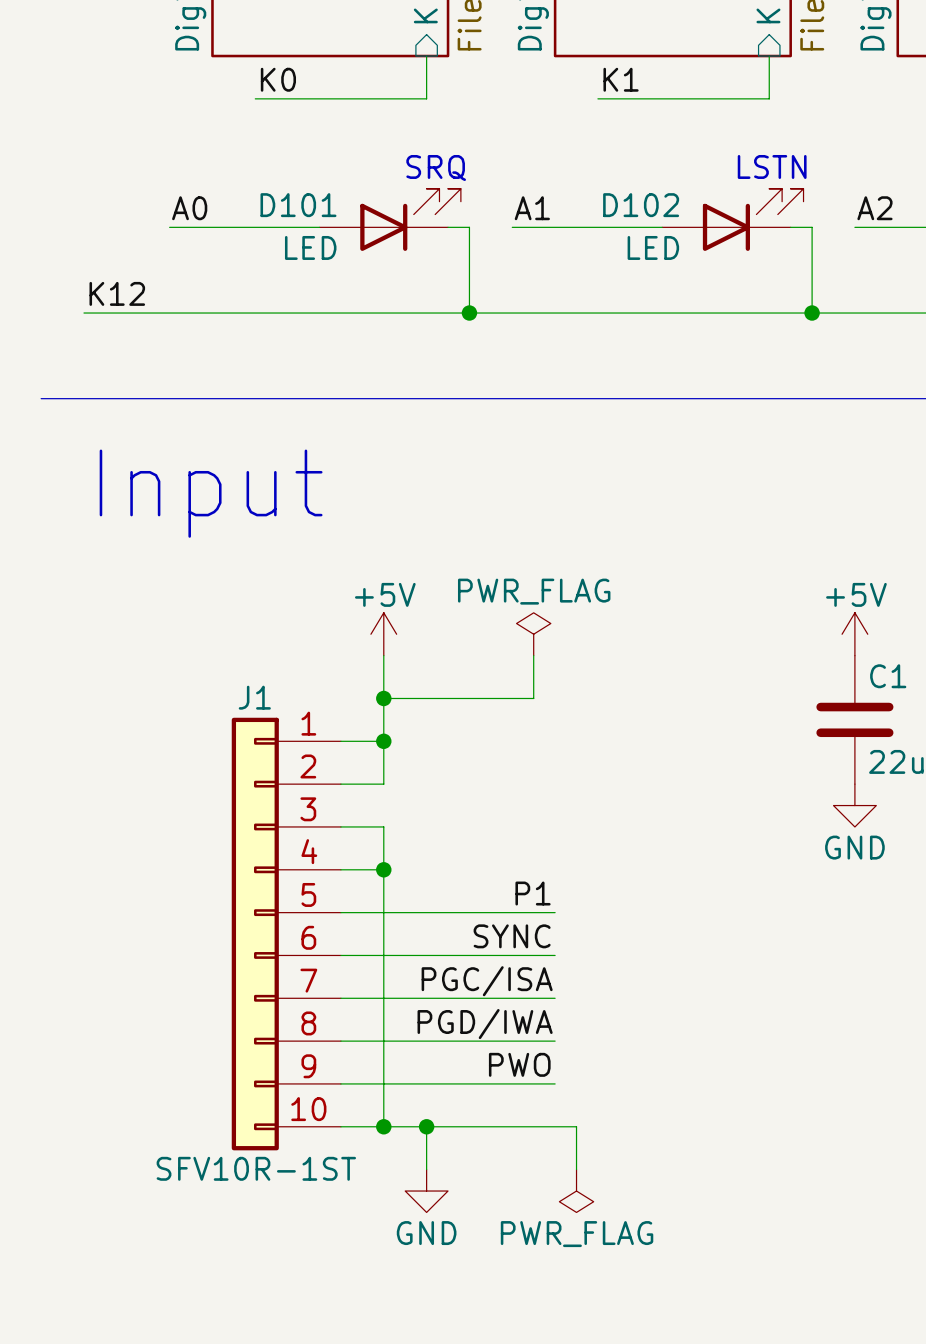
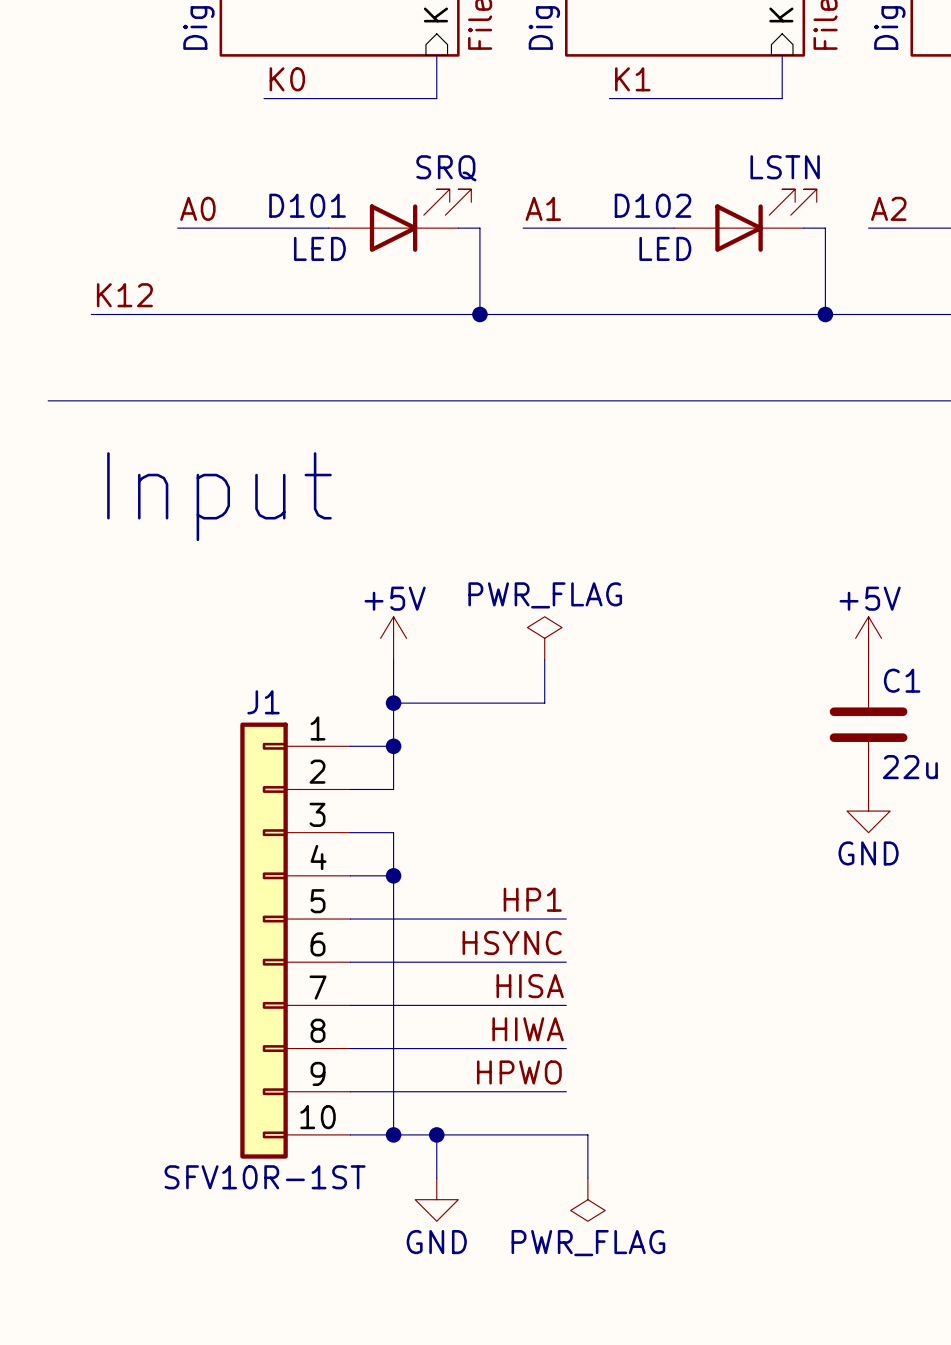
label: P1 (533, 893) -> HP1 (532, 899)
label: SYNC (512, 936) -> HSYNC (512, 942)
label: PGC/ISA (487, 981) -> HISA (530, 986)
label: PGD/IWA (485, 1024) -> HIWA (528, 1029)
label: PWO (519, 1064) -> HPWO (519, 1072)

